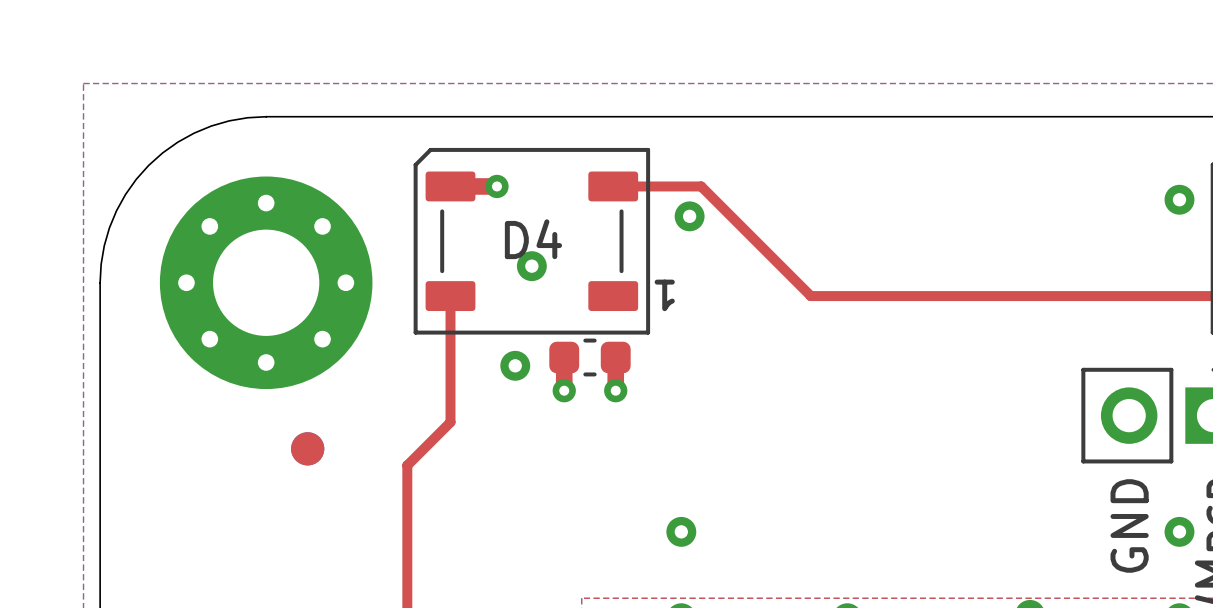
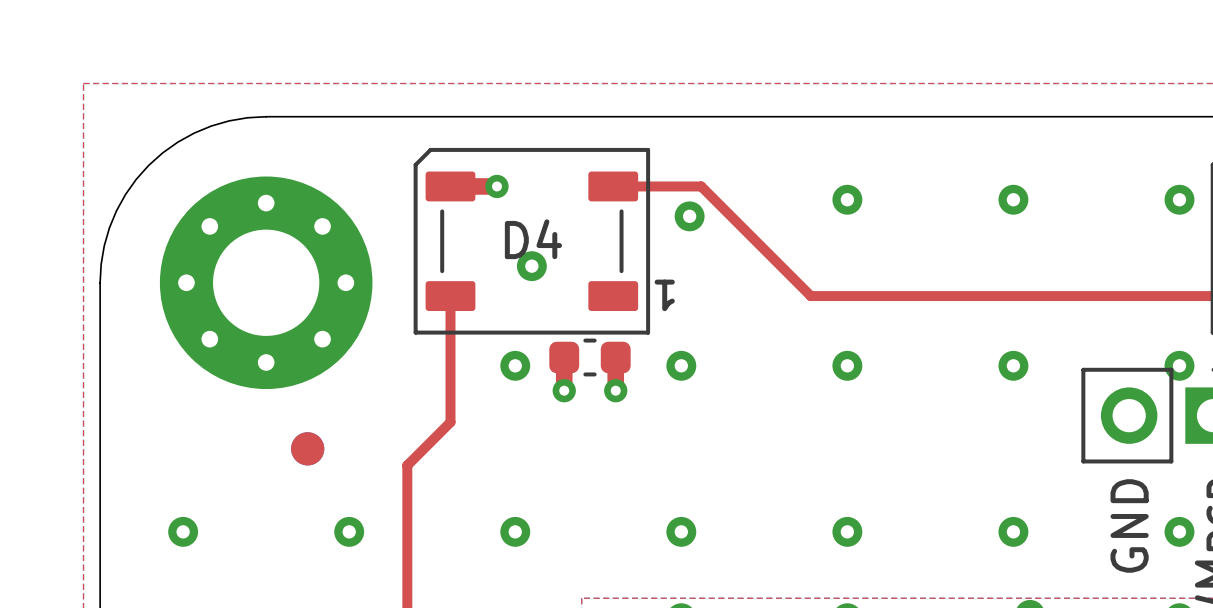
via: none -> (847, 199)
via: none -> (1013, 199)
via: none -> (681, 365)
via: none -> (847, 365)
via: none -> (1013, 365)
via: none -> (1179, 365)
via: none -> (183, 531)
via: none -> (349, 531)
via: none -> (515, 531)
via: none -> (847, 531)
via: none -> (1013, 531)

